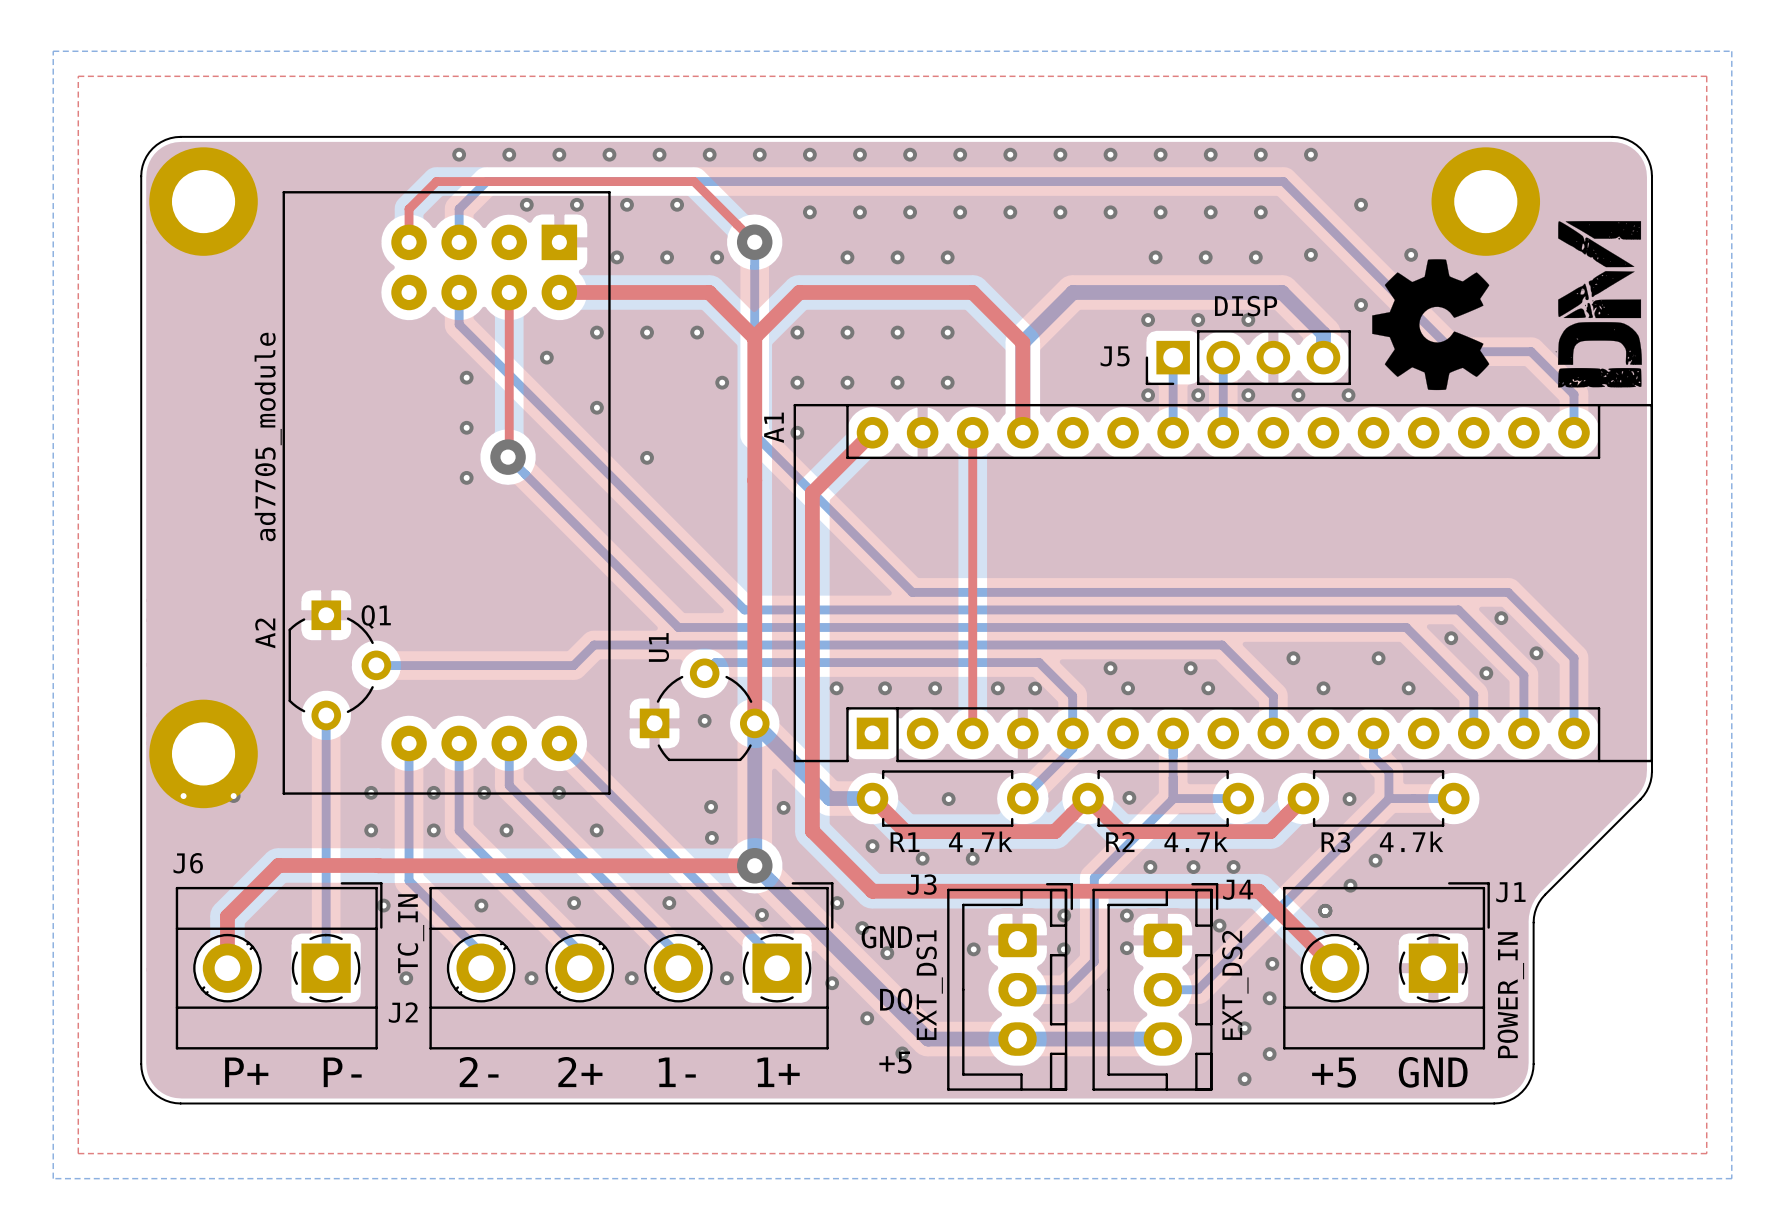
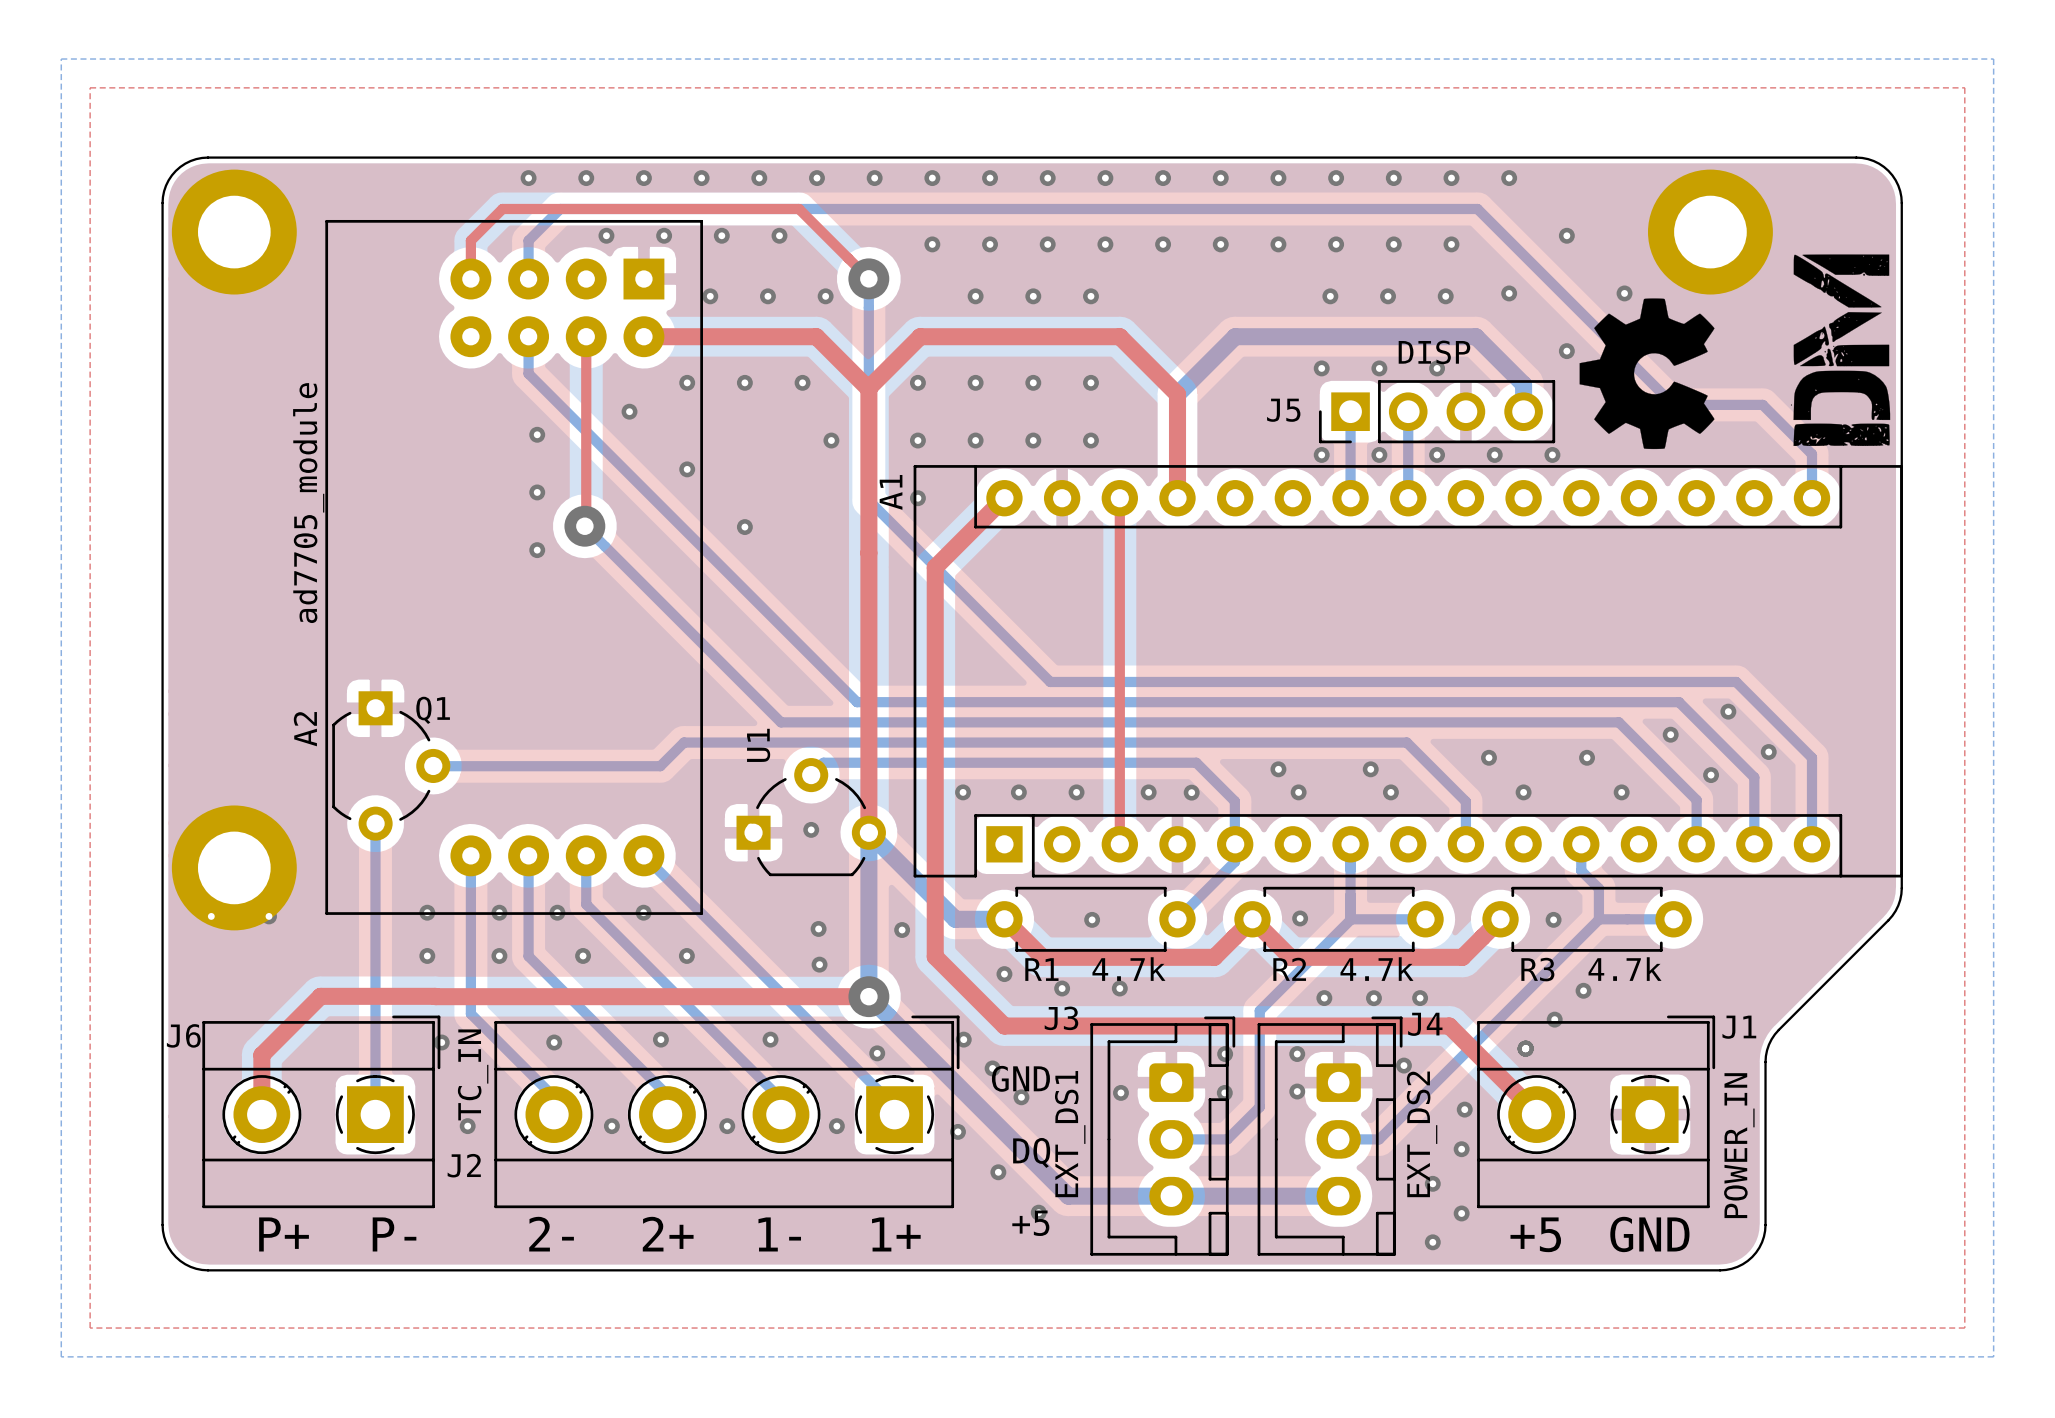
J6 name position: J6 (188, 863) -> J6 (183, 1035)

